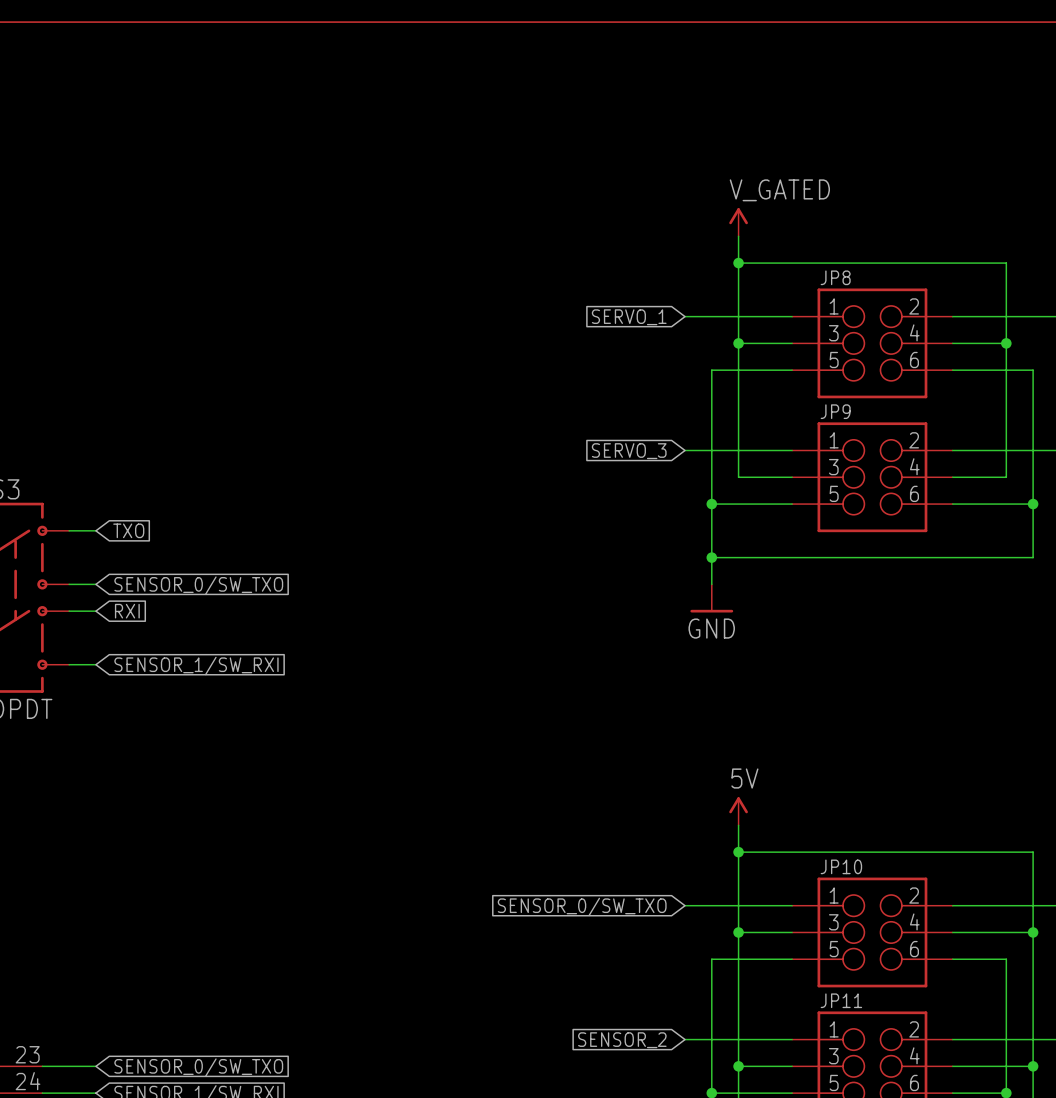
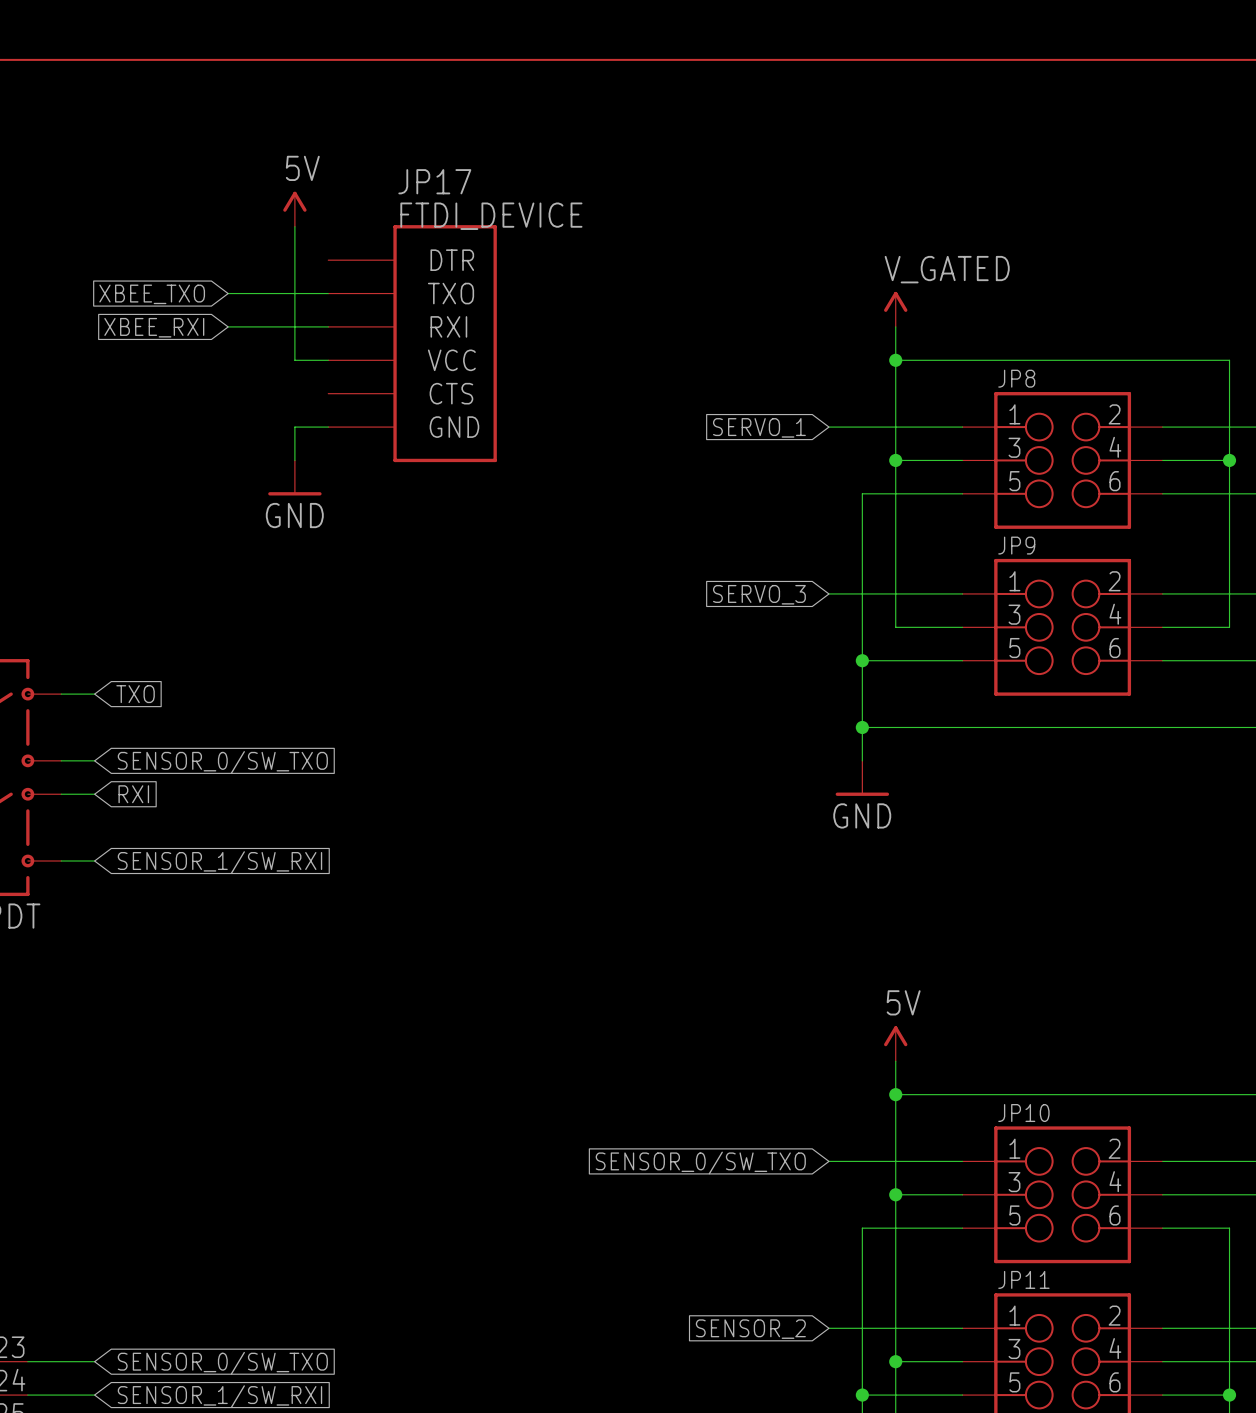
power symbol: none -> 5V (294, 209)
wire: none -> (294, 226) (294, 360) (328, 360)
wire: none -> (228, 293) (328, 293)
global label: none -> XBEE_TXO (152, 294)
global label: none -> XBEE_RXI (154, 327)
wire: none -> (228, 326) (328, 326)
JP17: none -> FTDI_DEVICE (412, 343)
wire: none -> (328, 427) (294, 427) (294, 460)
power symbol: none -> GND (294, 477)

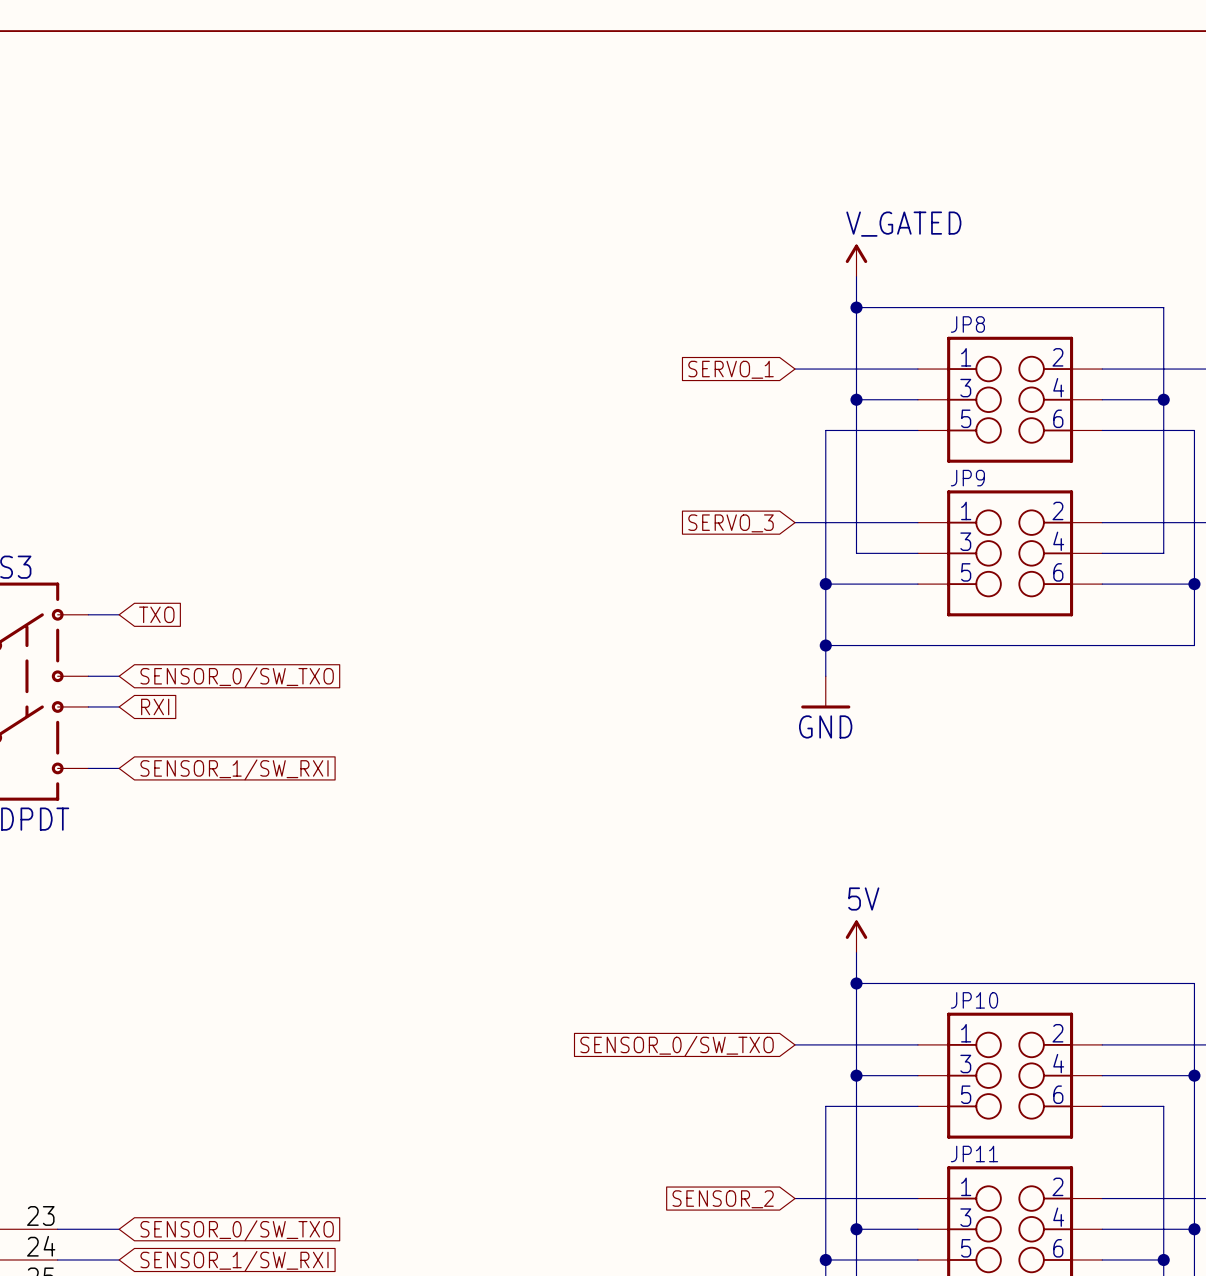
power symbol: 5V (294, 209) -> none
wire: (294, 226) (294, 360) (328, 360) -> none
wire: (228, 293) (328, 293) -> none
global label: XBEE_TXO (152, 294) -> none
wire: (228, 326) (328, 326) -> none
global label: XBEE_RXI (154, 327) -> none
JP17: FTDI_DEVICE (412, 343) -> none
wire: (328, 427) (294, 427) (294, 460) -> none
power symbol: GND (294, 477) -> none

